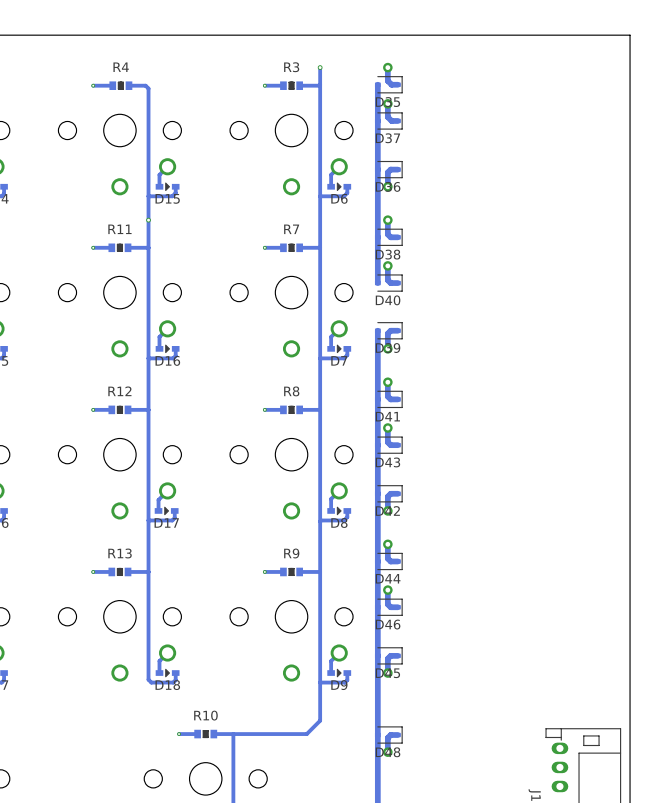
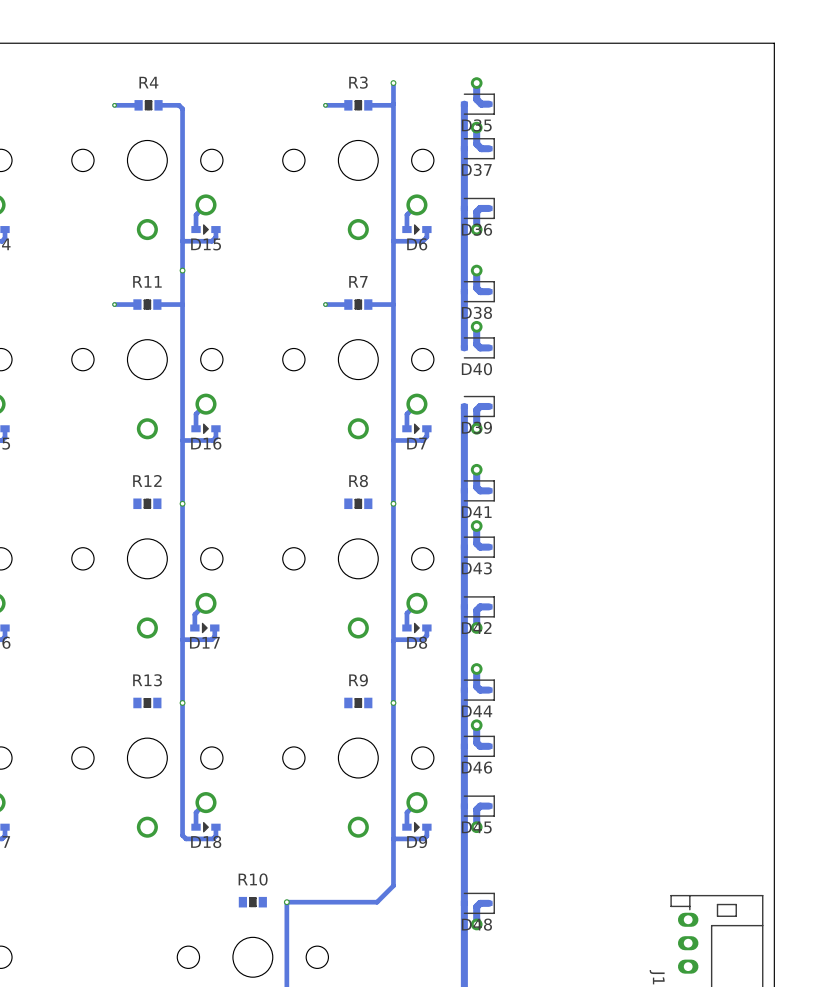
via: (93, 409) -> none
track: (111, 409) (93, 409) -> none
track: (148, 409) (128, 409) -> none
via: none -> (182, 503)
via: (264, 409) -> none
track: (283, 409) (264, 409) -> none
track: (320, 409) (299, 409) -> none
via: none -> (393, 503)
via: (93, 571) -> none
track: (111, 571) (93, 571) -> none
track: (148, 571) (128, 571) -> none
via: none -> (182, 702)
via: (264, 571) -> none
track: (283, 571) (264, 571) -> none
track: (320, 571) (299, 571) -> none
via: none -> (393, 702)
via: (179, 734) -> none
track: (197, 734) (179, 734) -> none
track: (233, 734) (213, 734) -> none
via: none -> (286, 902)

